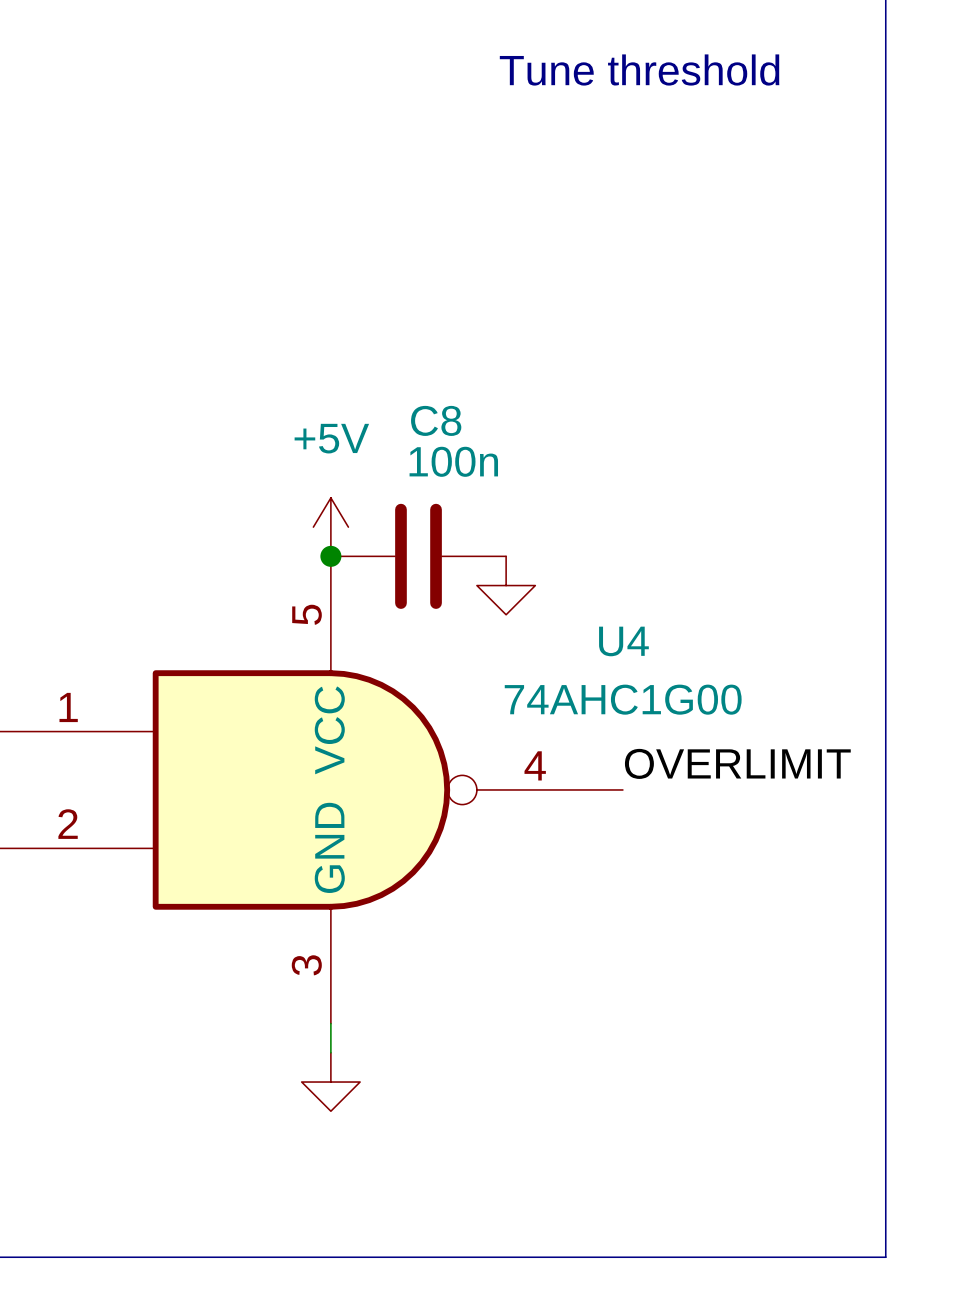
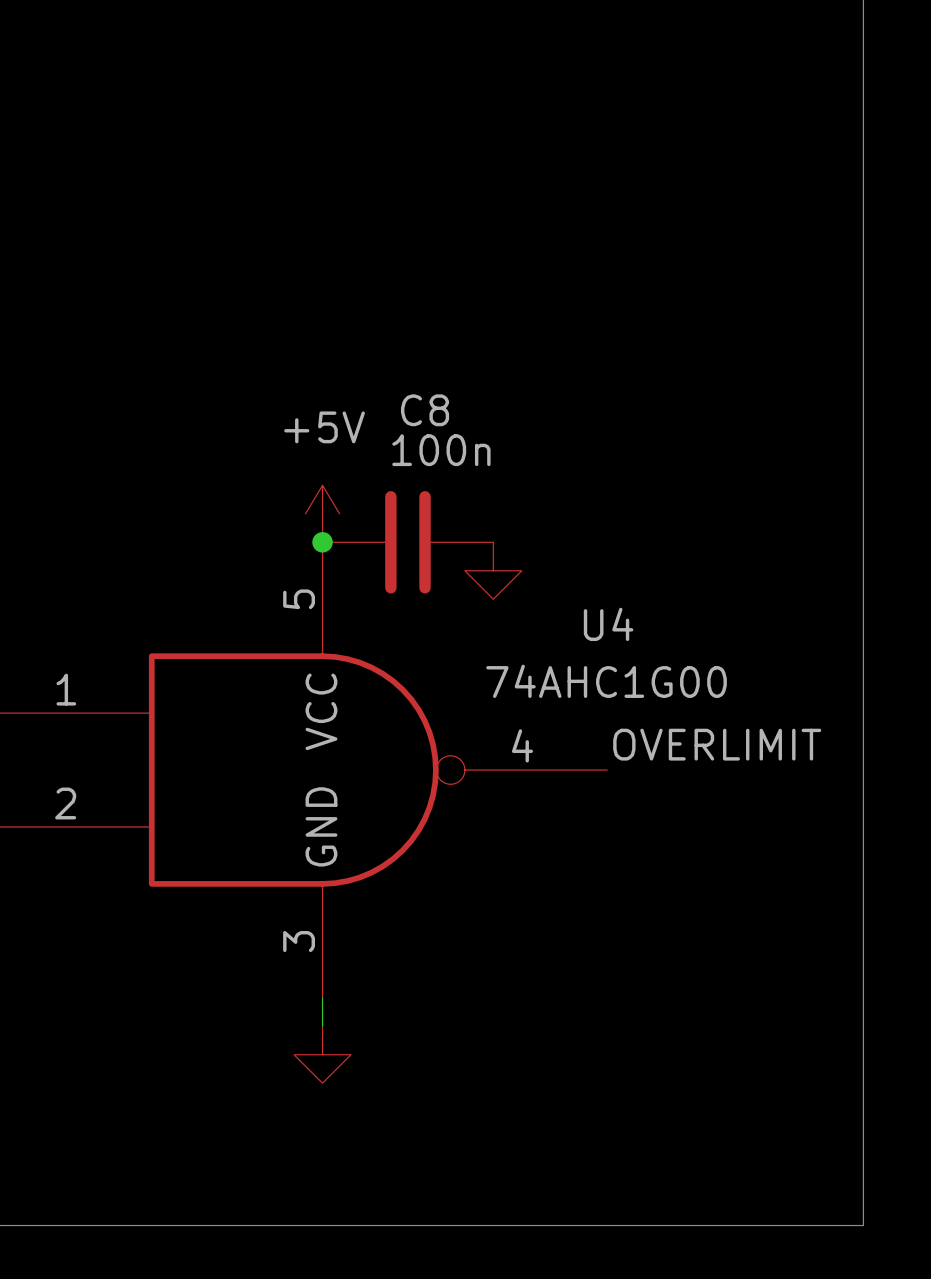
text: Tune threshold (639, 70) -> none

